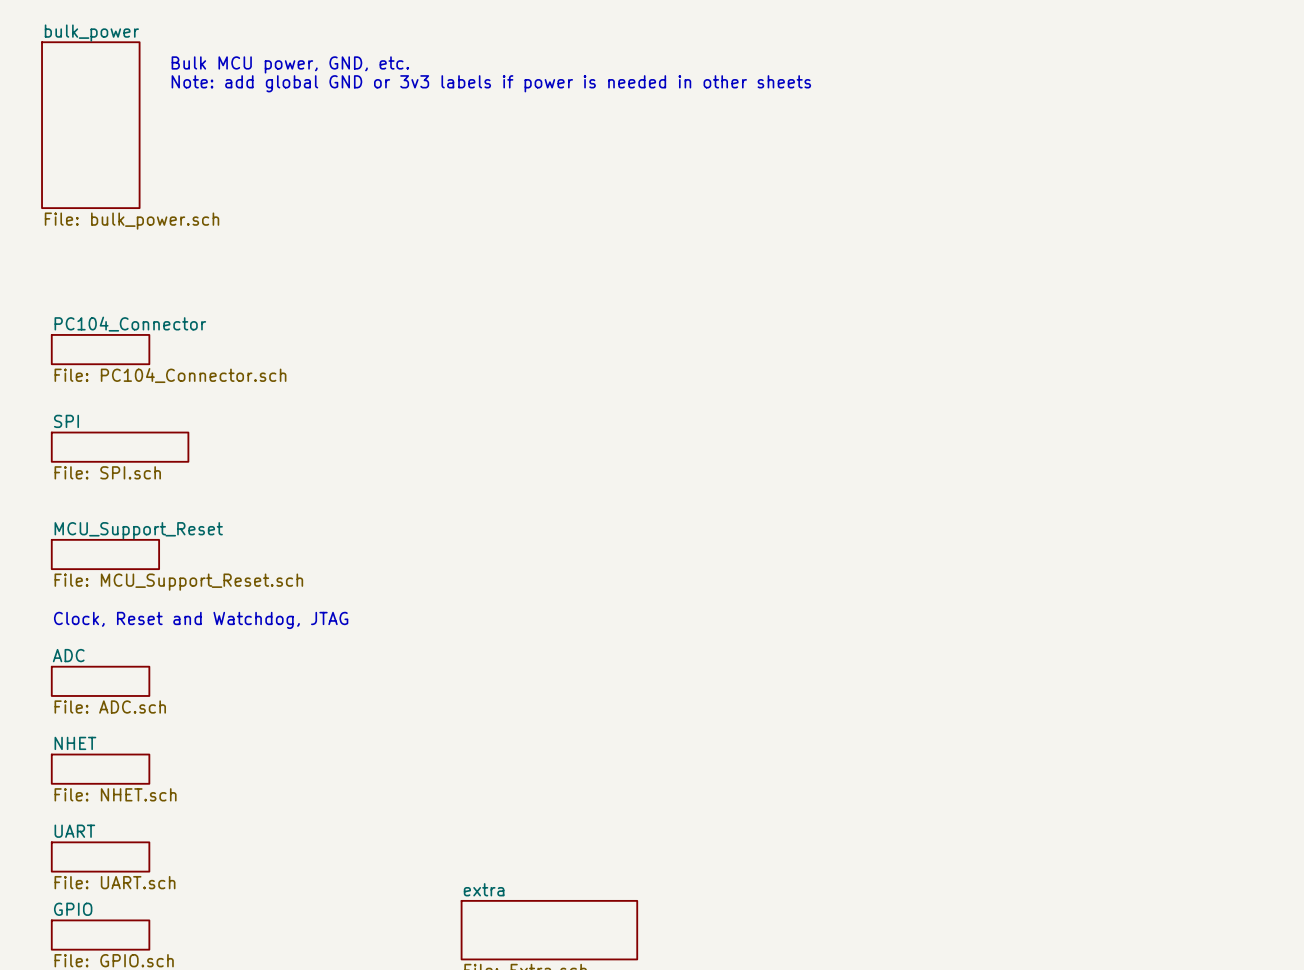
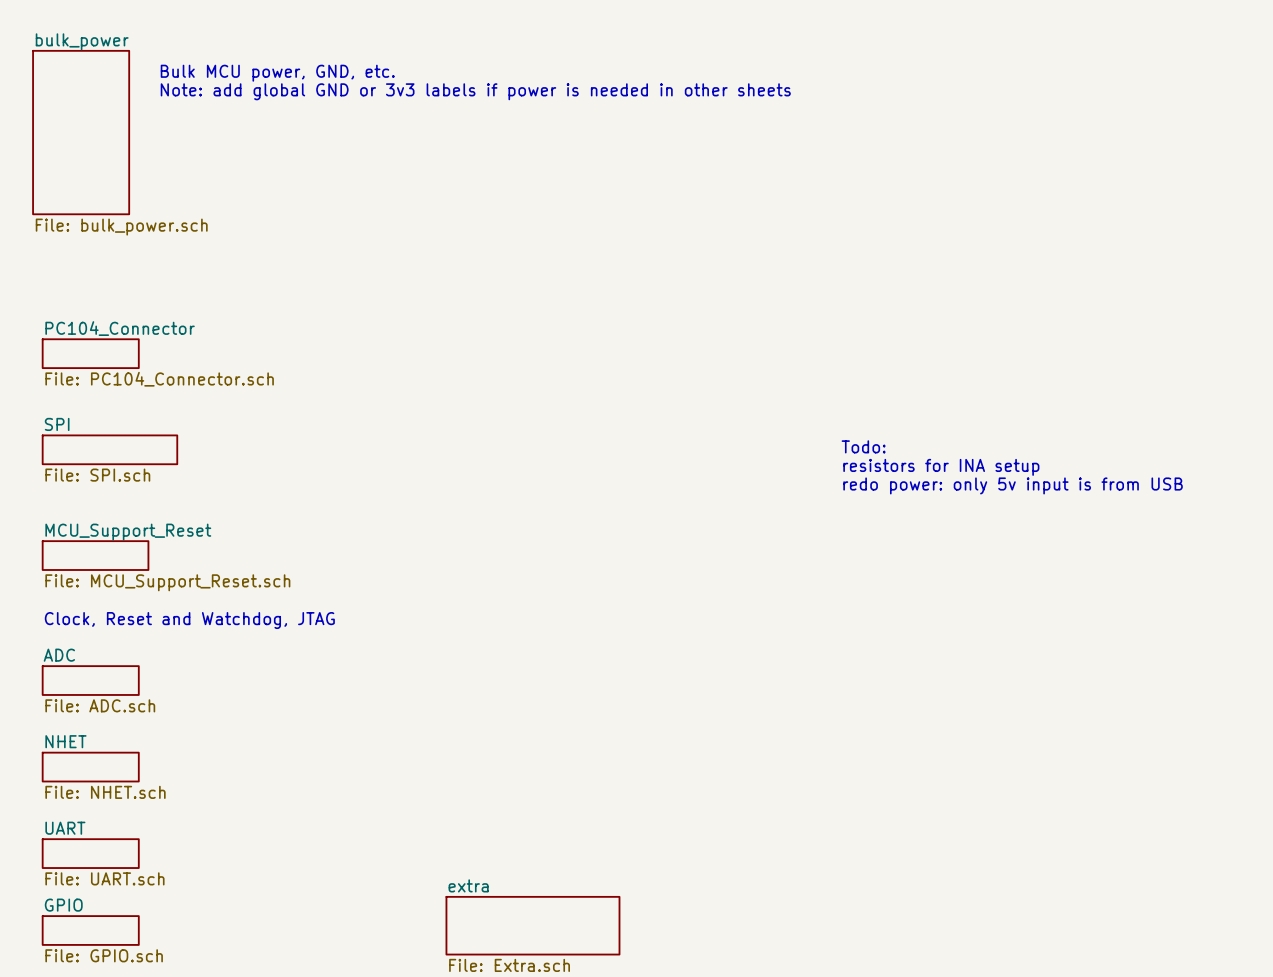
text: none -> Todo: (863, 446)
text: none -> resistors for INA setup (941, 467)
text: none -> redo power: only 5v input is from USB (1013, 485)

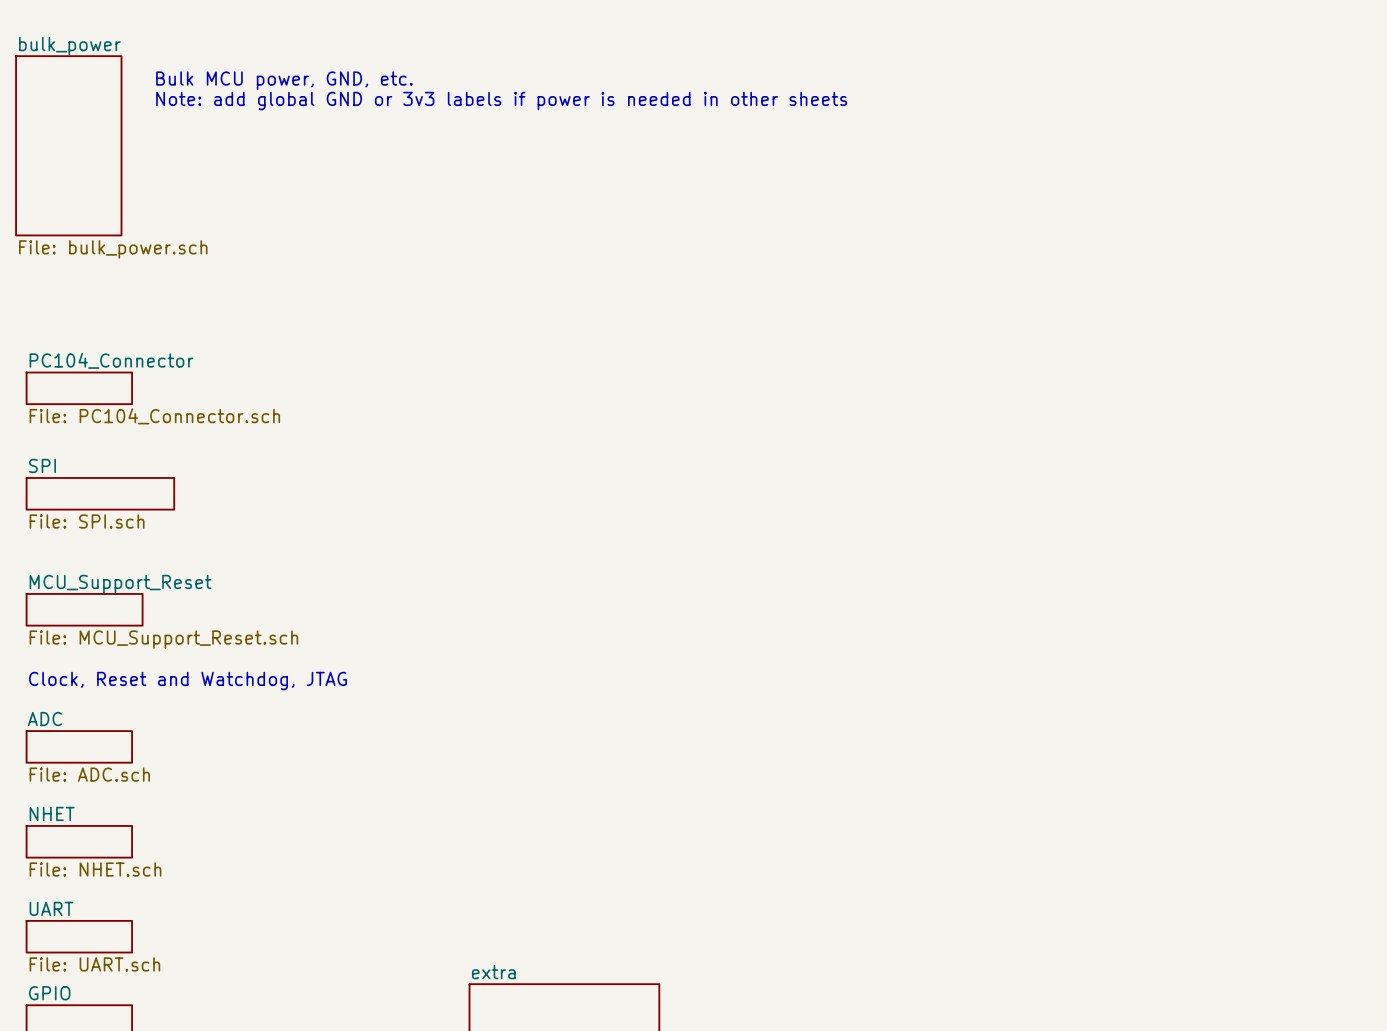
text: Todo: (863, 446) -> none
text: resistors for INA setup (941, 467) -> none
text: redo power: only 5v input is from USB (1013, 485) -> none

